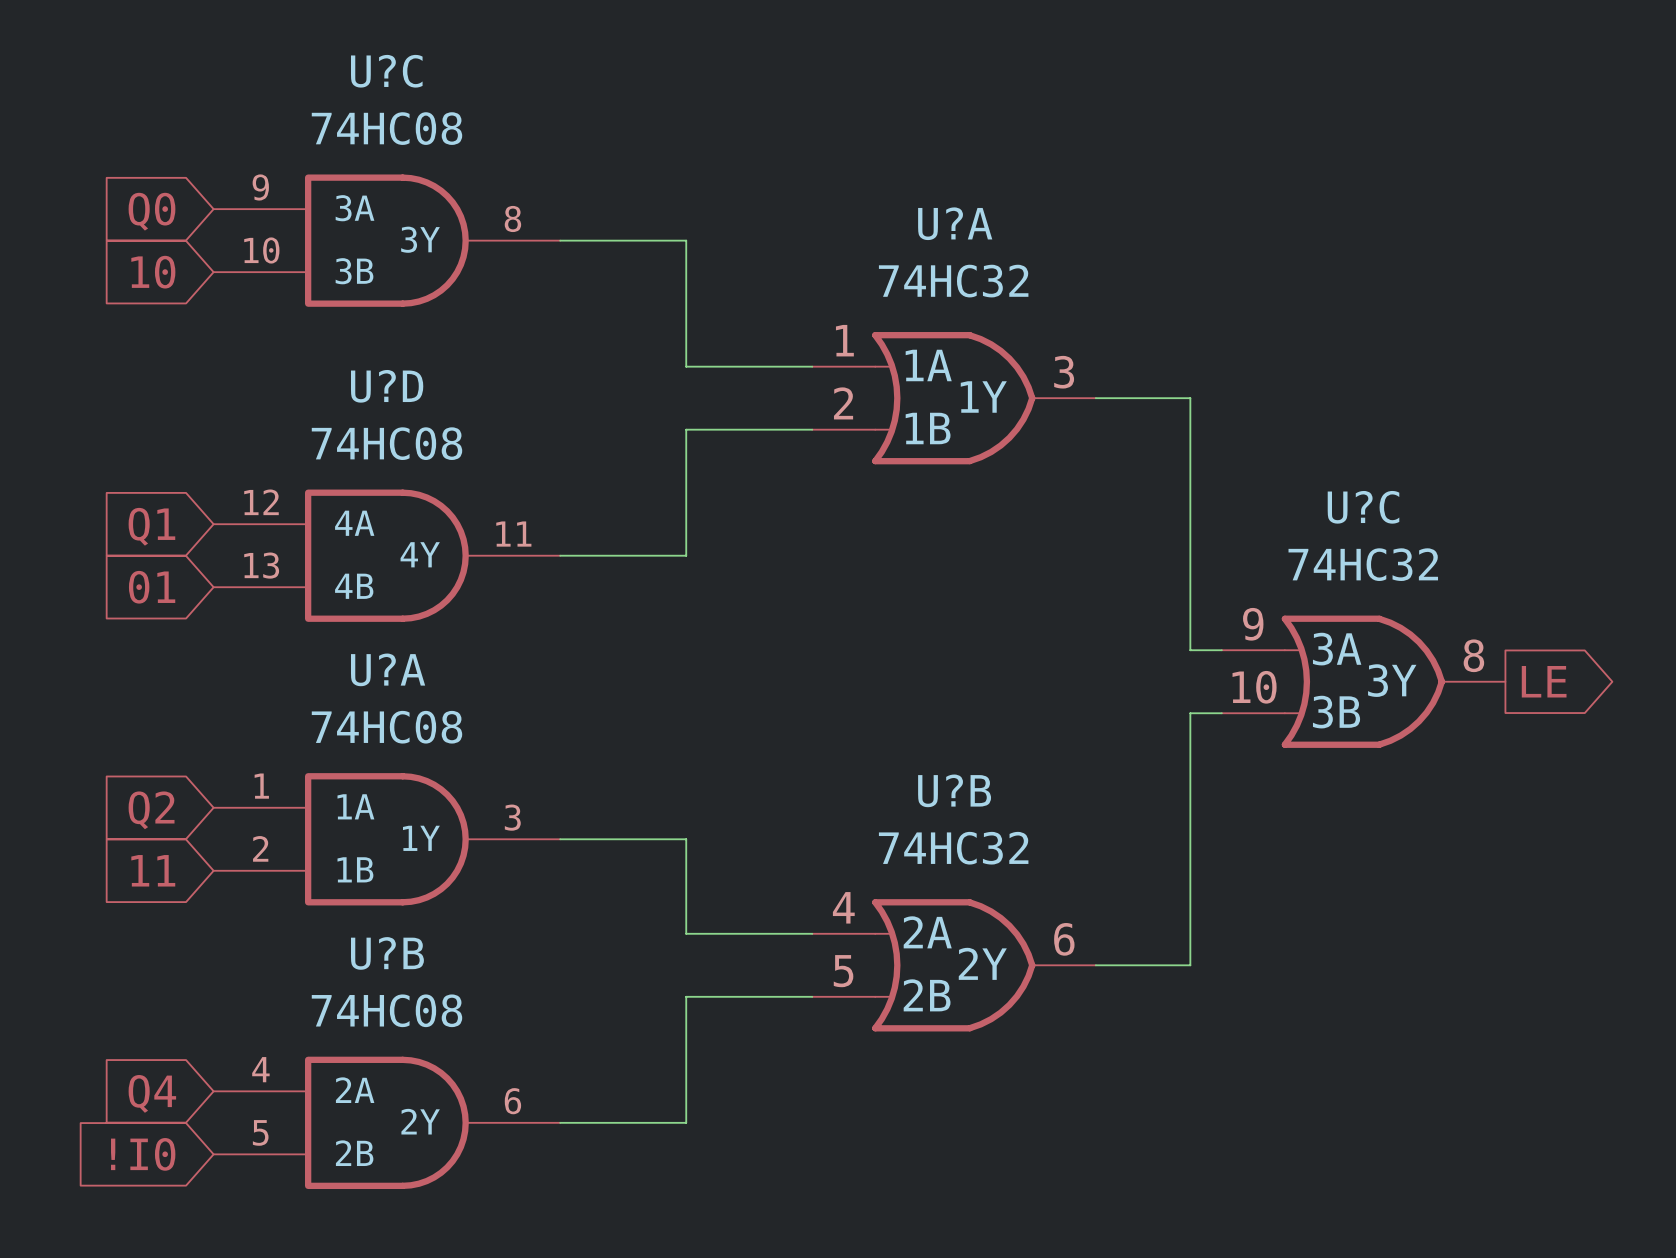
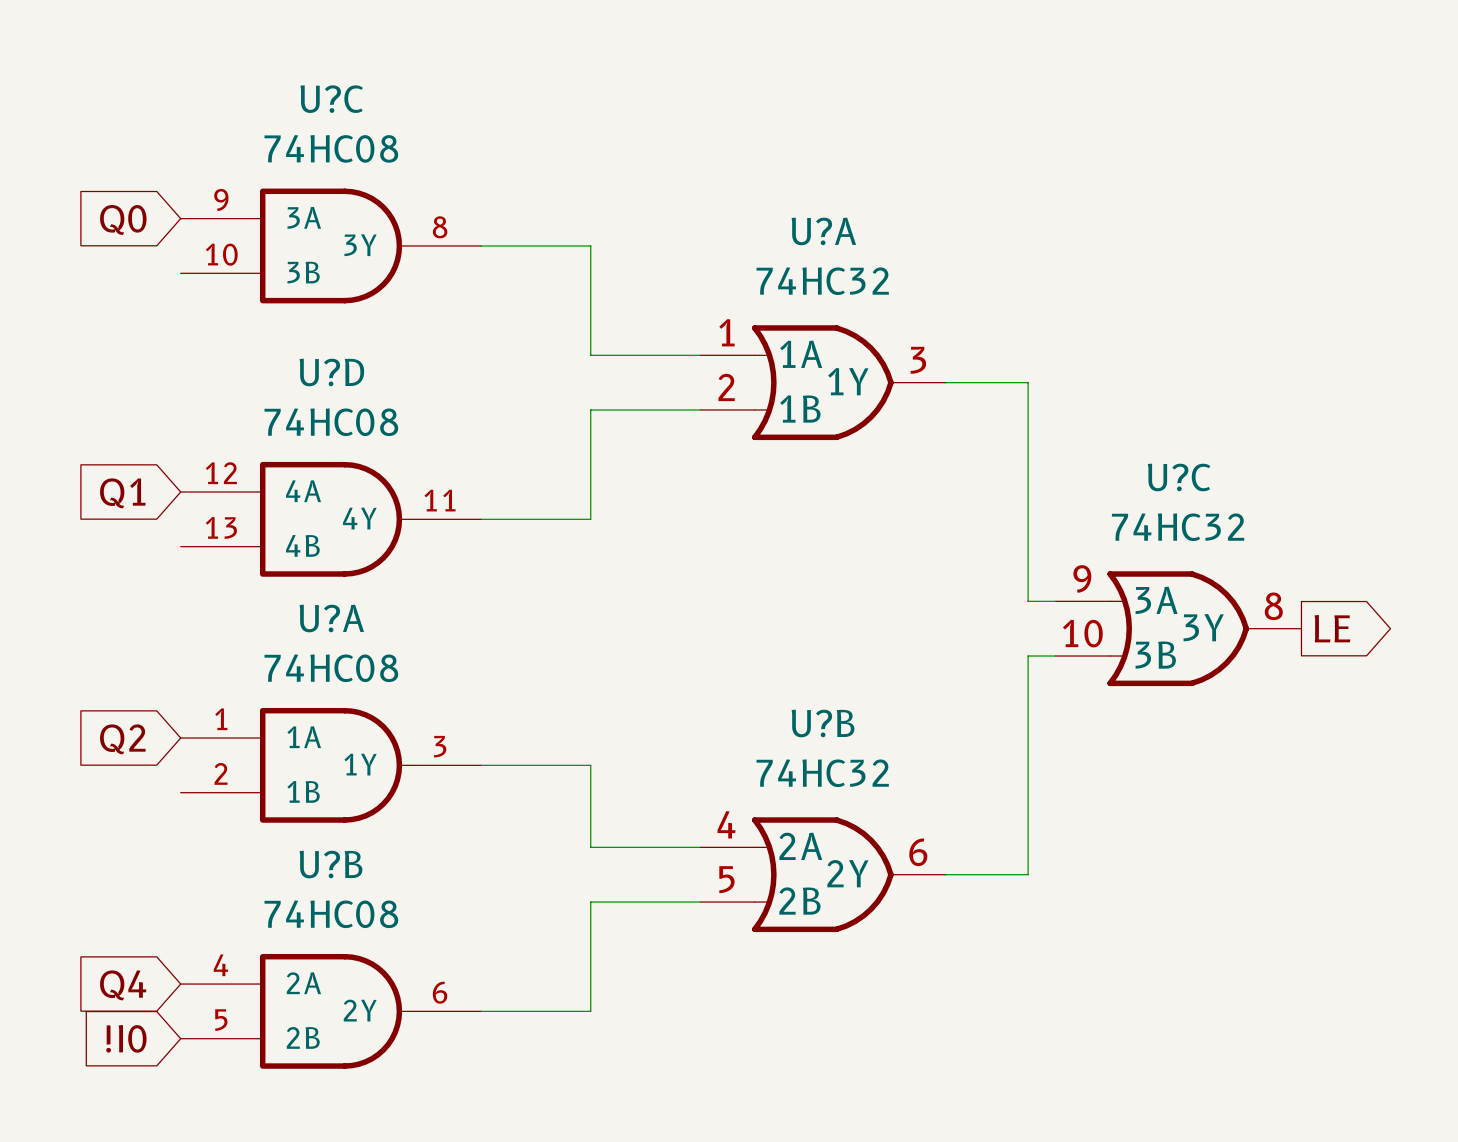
global label: 10 (153, 272) -> none
global label: 01 (152, 587) -> none
global label: 11 (153, 870) -> none

